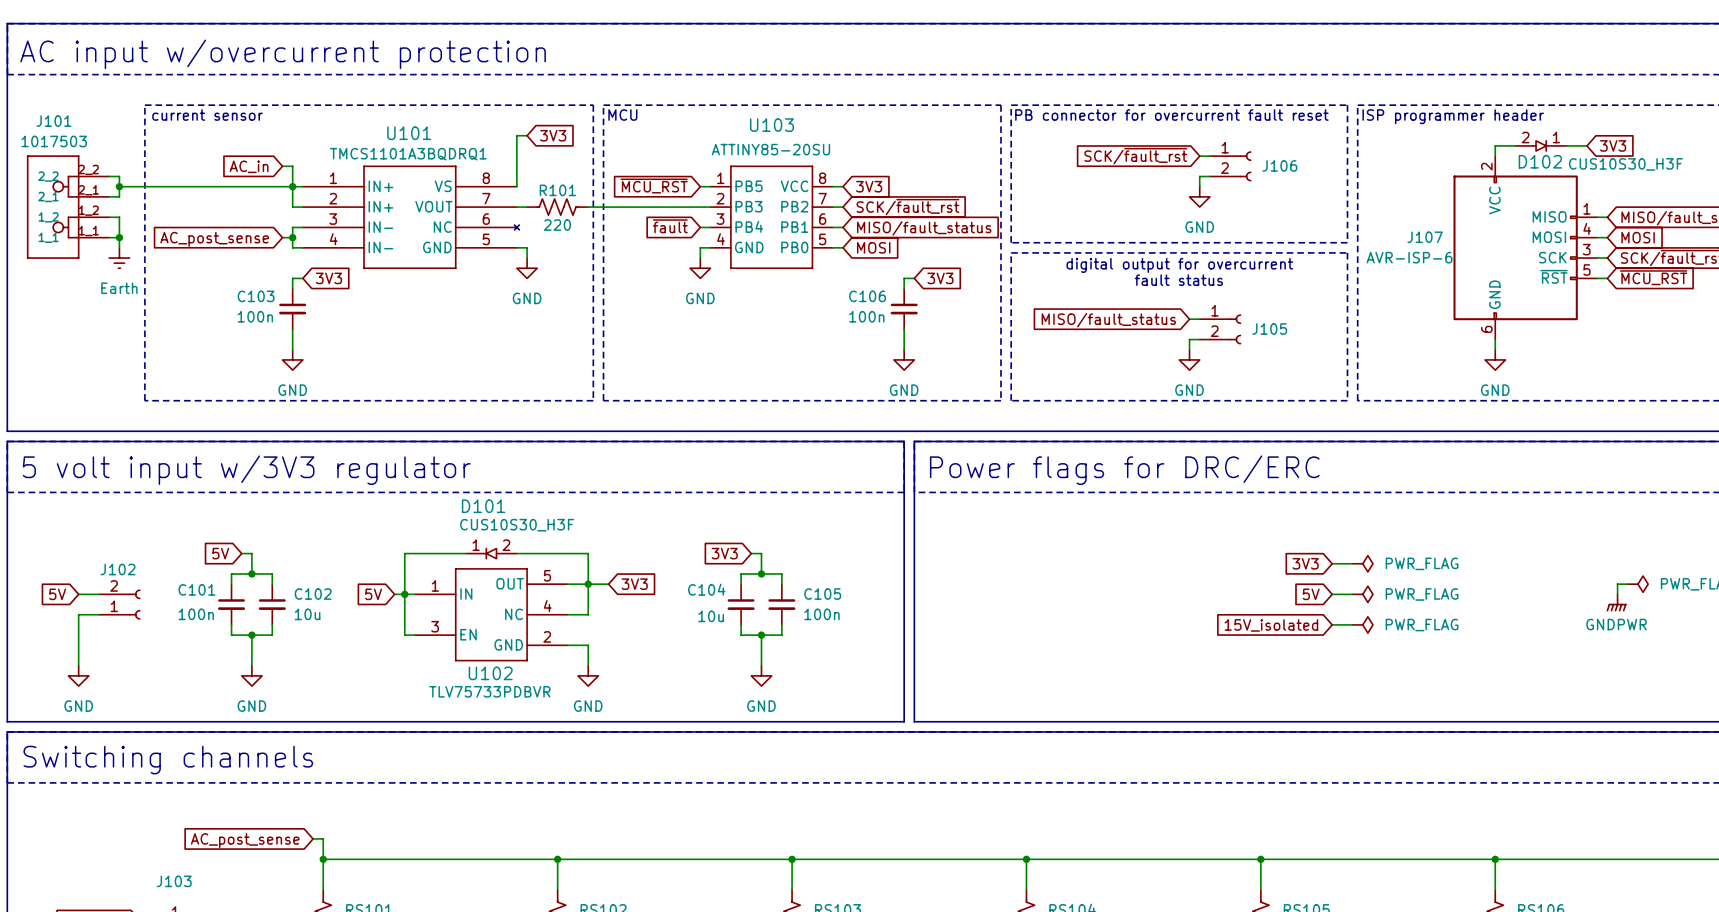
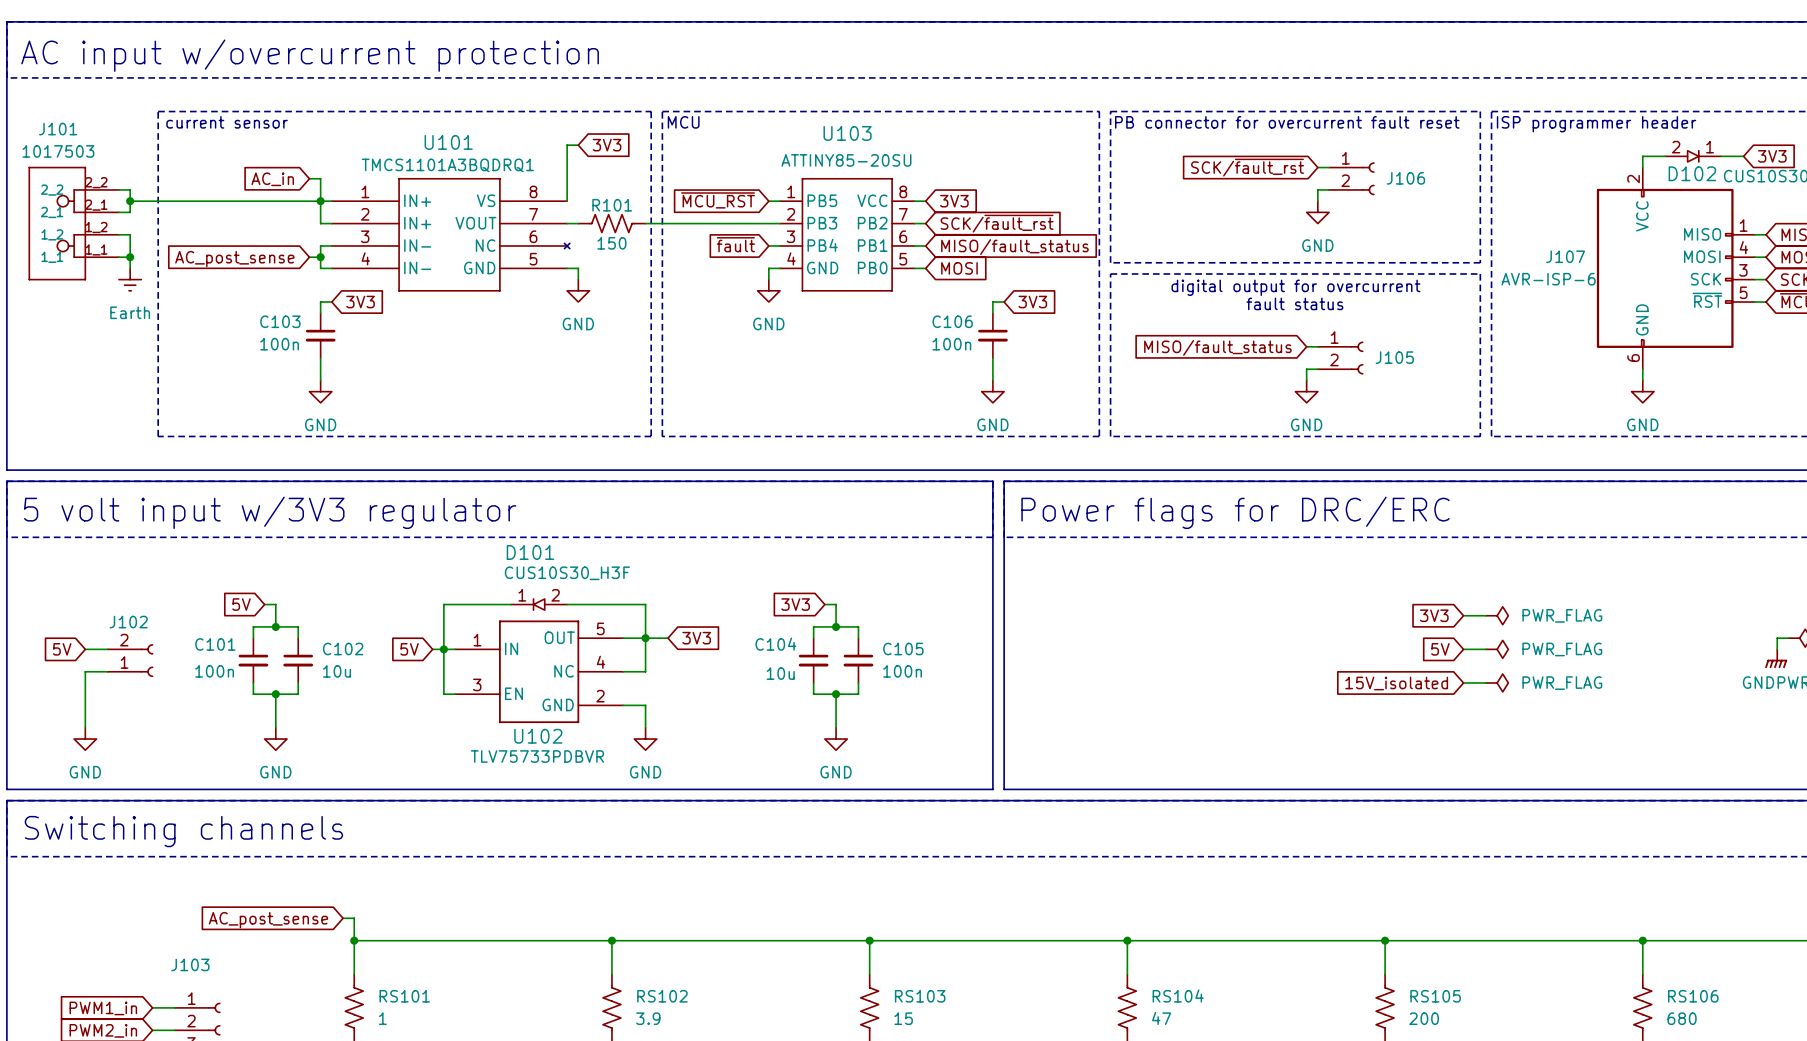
R101 value: 220 (557, 225) -> 150 (611, 243)

